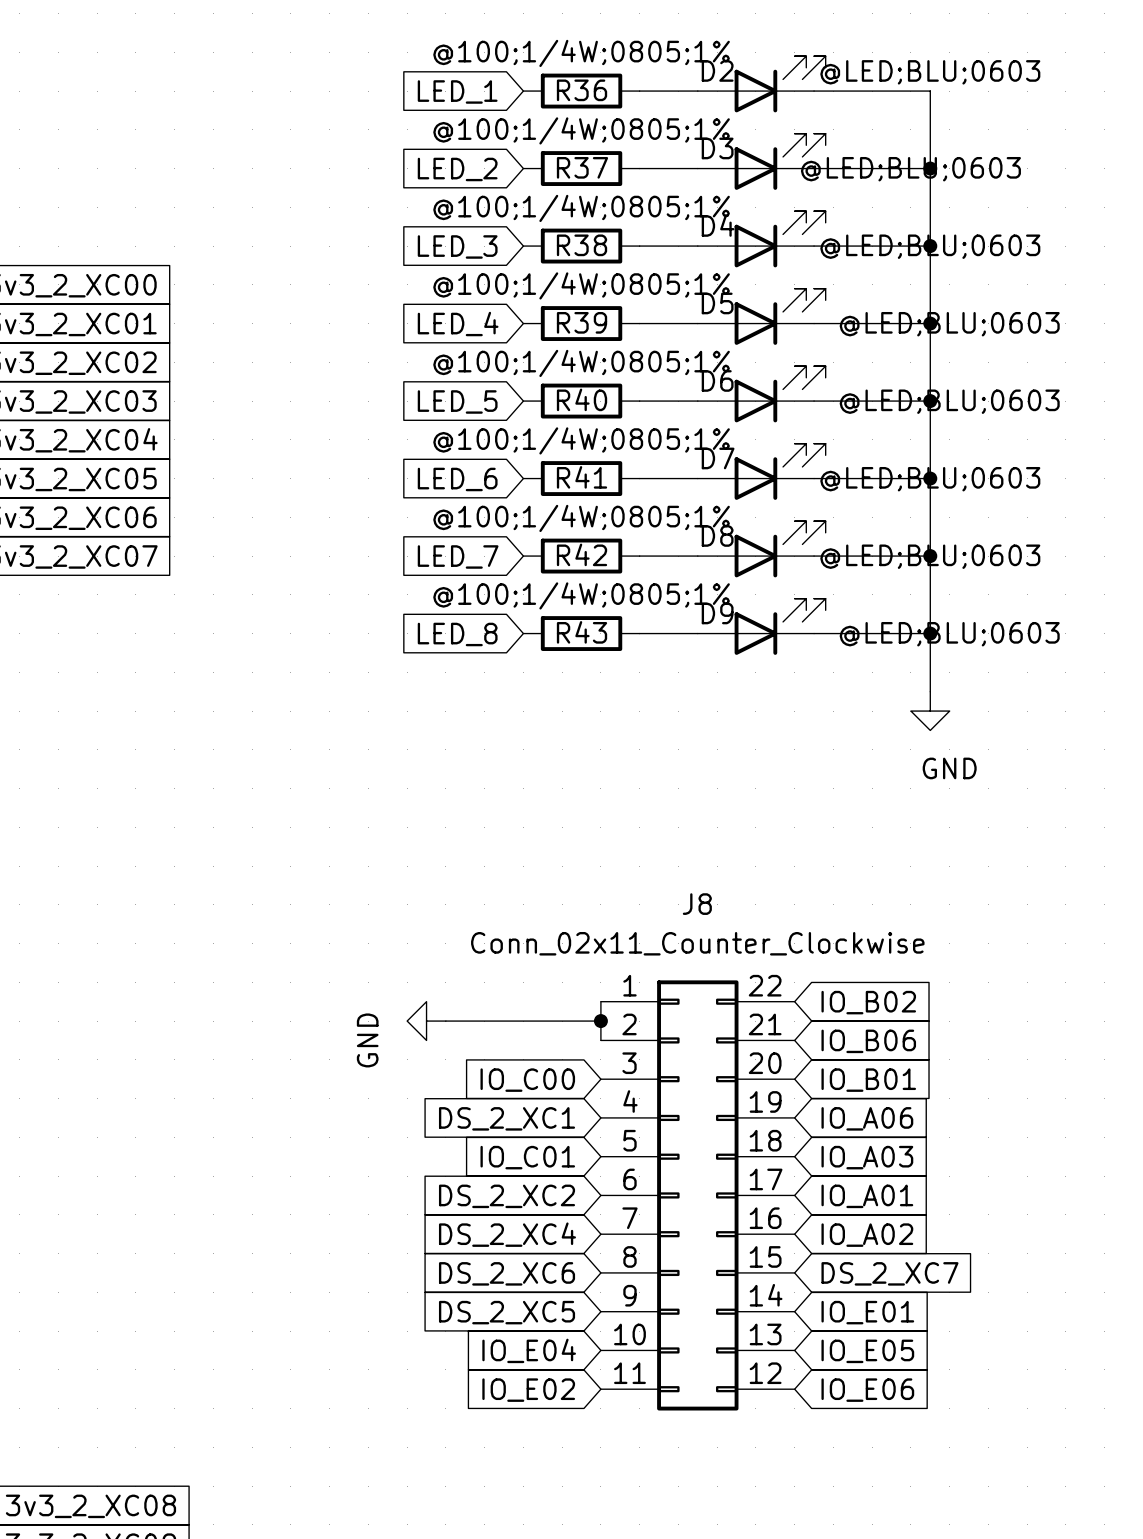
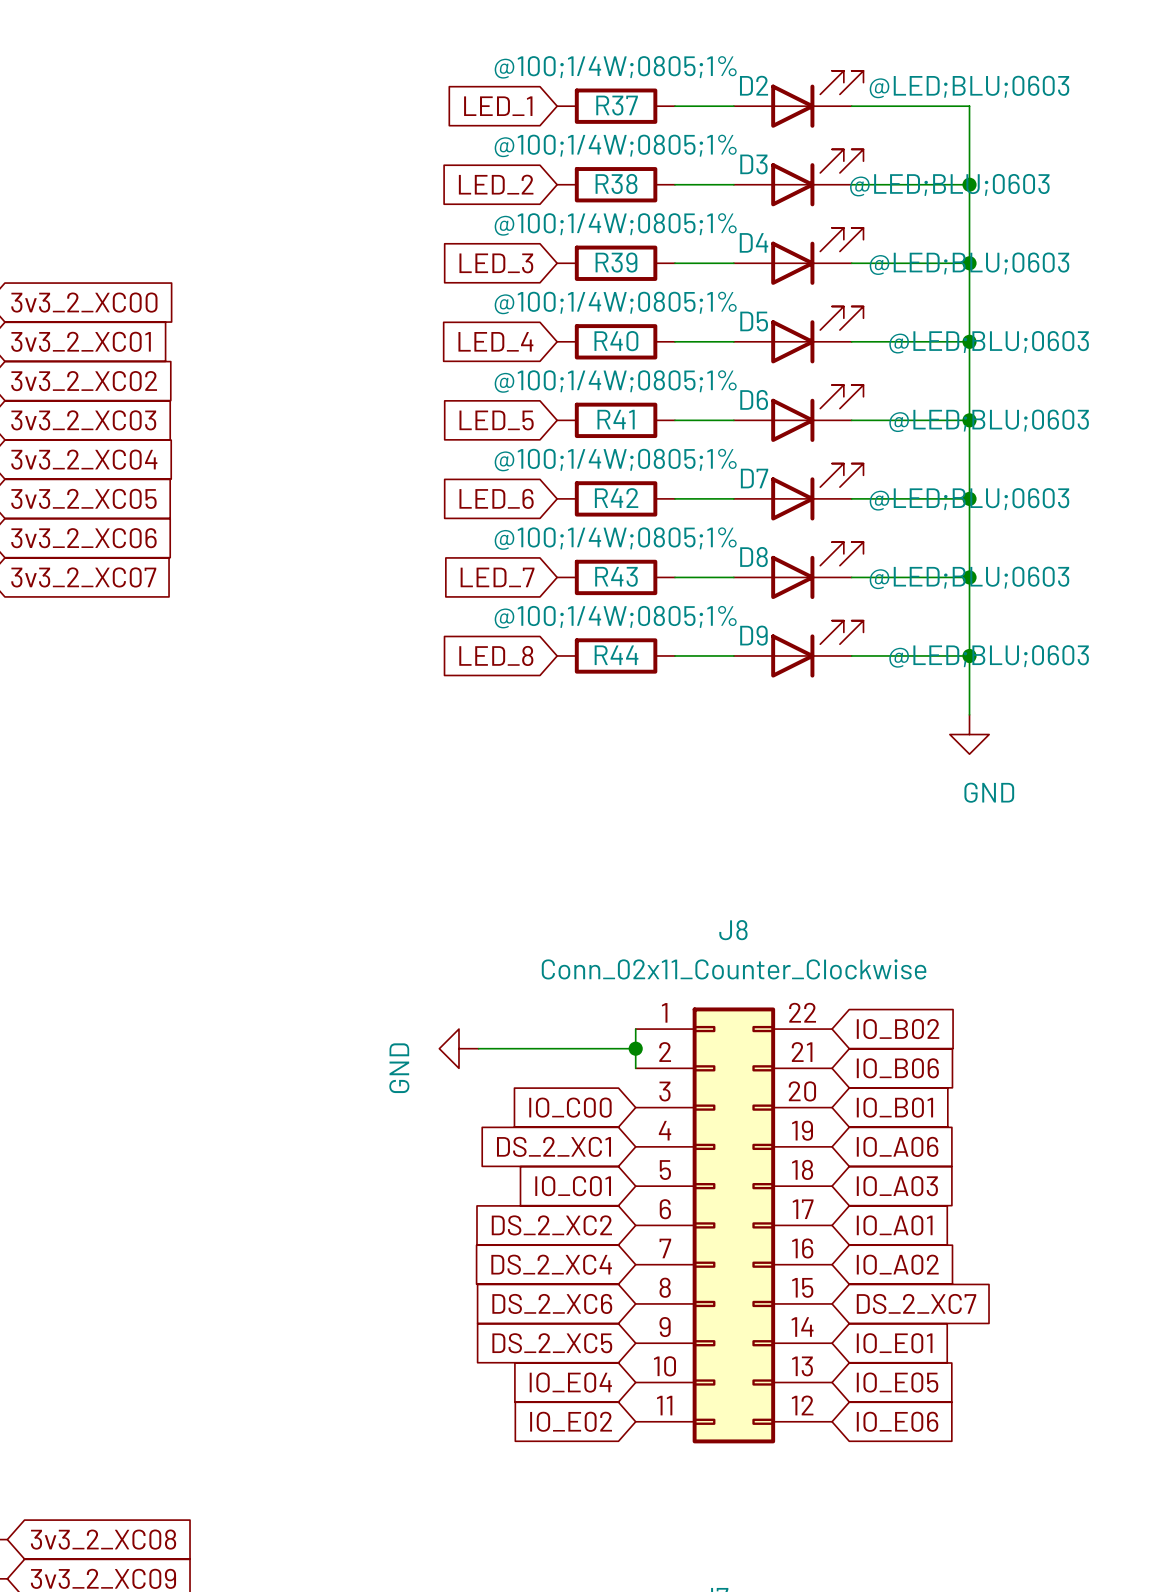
R36 name: R36 (582, 90) -> R37 (617, 105)
R37 name: R37 (582, 167) -> R38 (616, 183)
R38 name: R38 (582, 245) -> R39 (616, 262)
R39 name: R39 (582, 322) -> R40 (616, 341)
R40 name: R40 (582, 399) -> R41 (616, 419)
R41 name: R41 (582, 477) -> R42 (616, 498)
R42 name: R42 (582, 554) -> R43 (616, 576)
R43 name: R43 (582, 632) -> R44 (616, 655)

